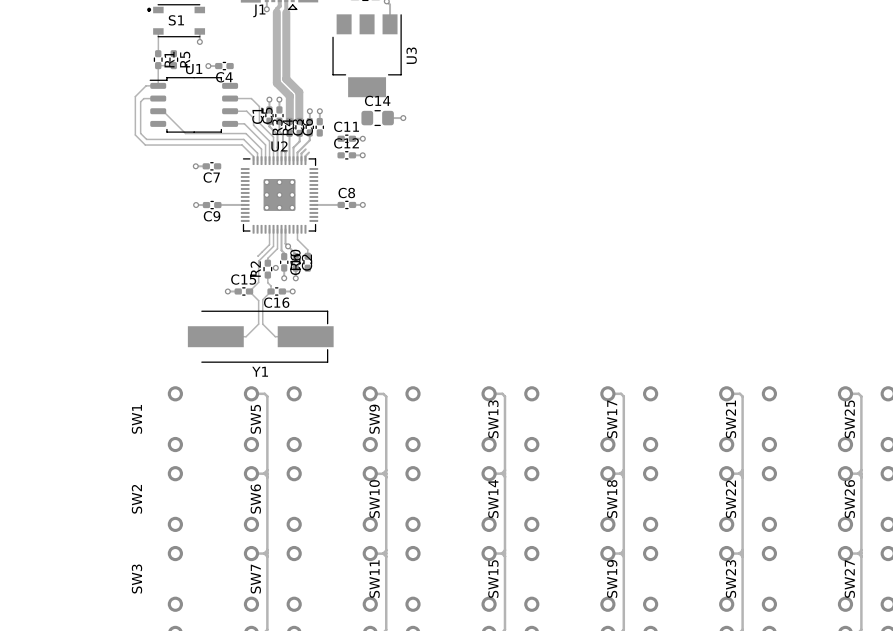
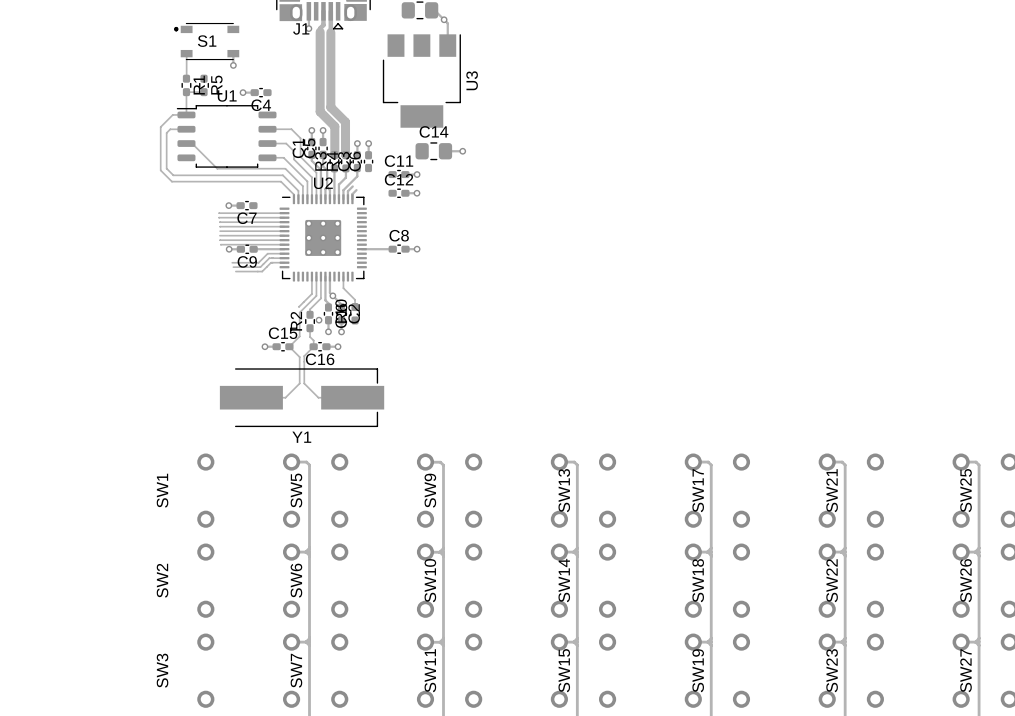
track: none -> (219, 213) (284, 213)
track: none -> (219, 217) (284, 217)
track: none -> (220, 222) (284, 222)
track: none -> (220, 226) (284, 226)
track: none -> (220, 231) (284, 231)
track: none -> (219, 235) (284, 235)
track: none -> (220, 240) (284, 240)
track: none -> (220, 244) (284, 244)
track: none -> (284, 253) (267, 253) (258, 262)
track: none -> (284, 258) (269, 258) (260, 267) (233, 267)
track: none -> (284, 262) (271, 262) (262, 271) (235, 271)
track: none -> (232, 262) (258, 262)

